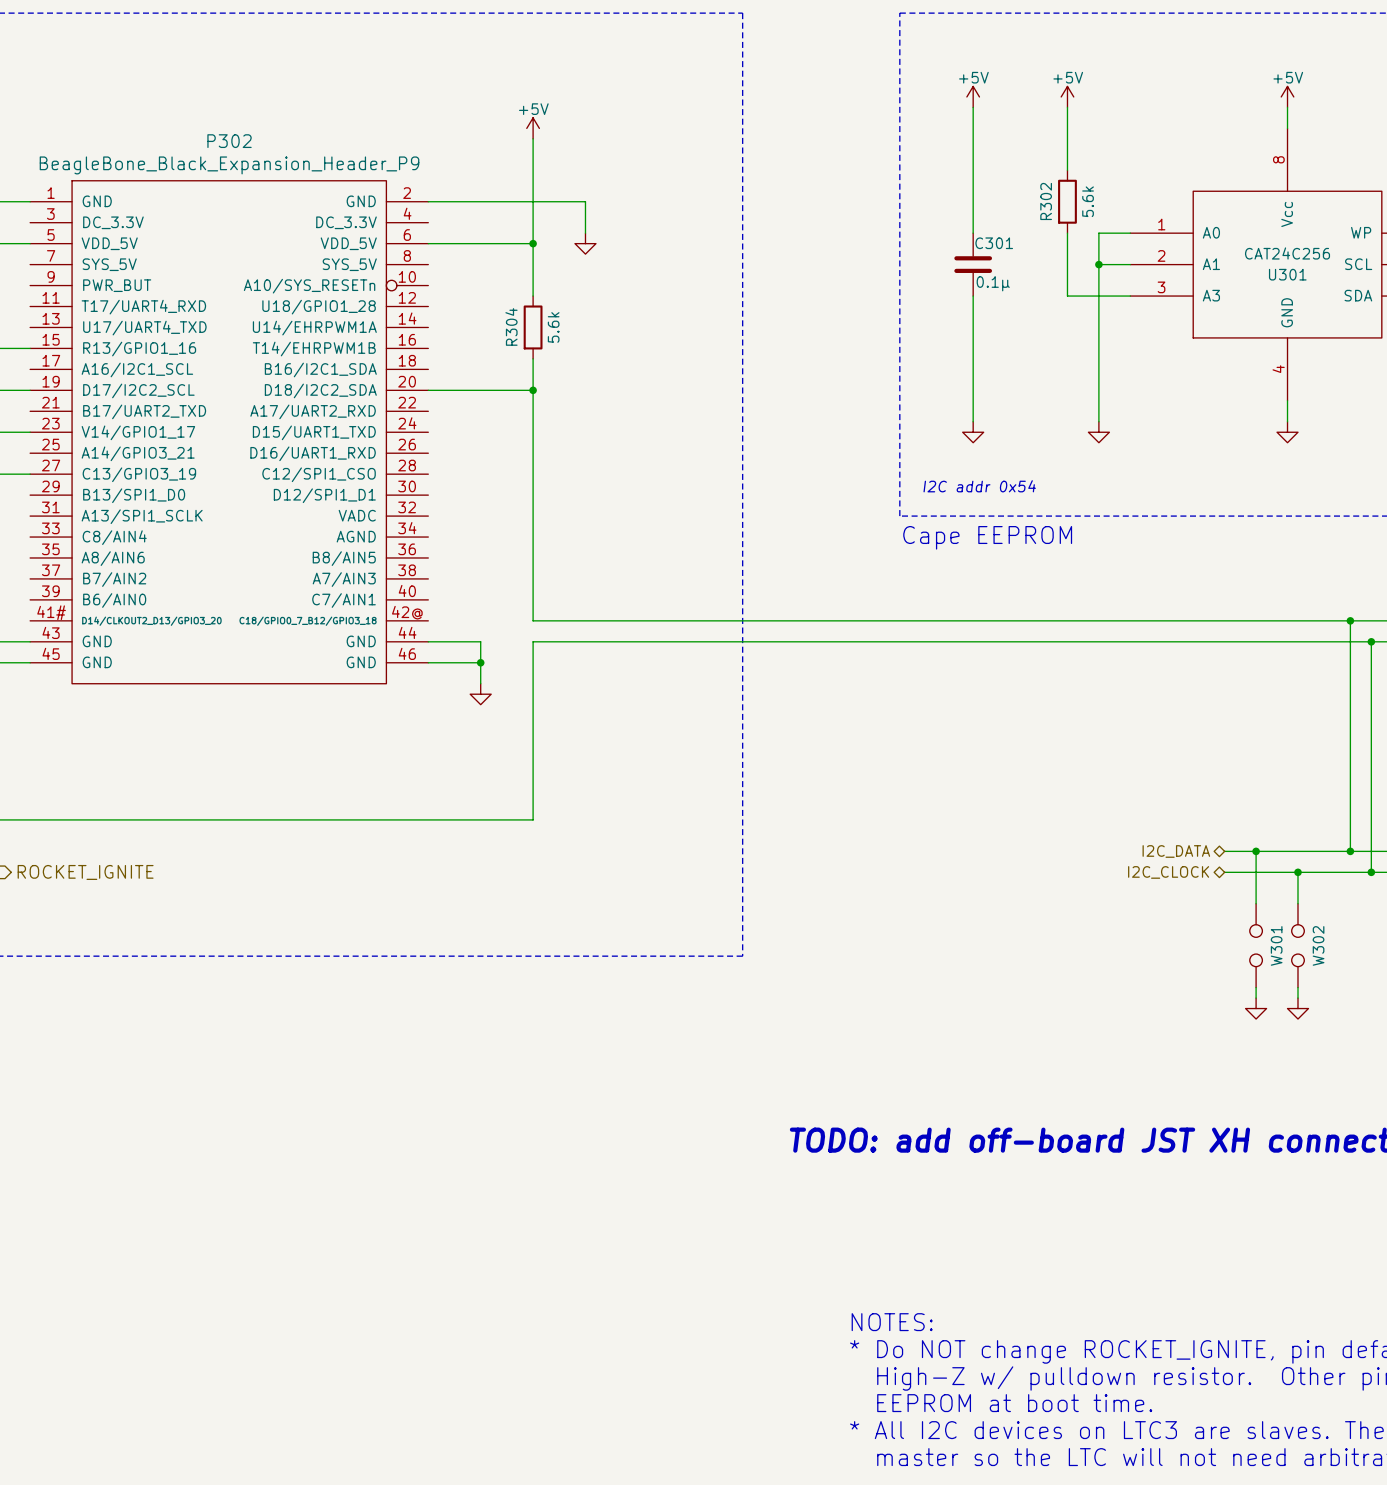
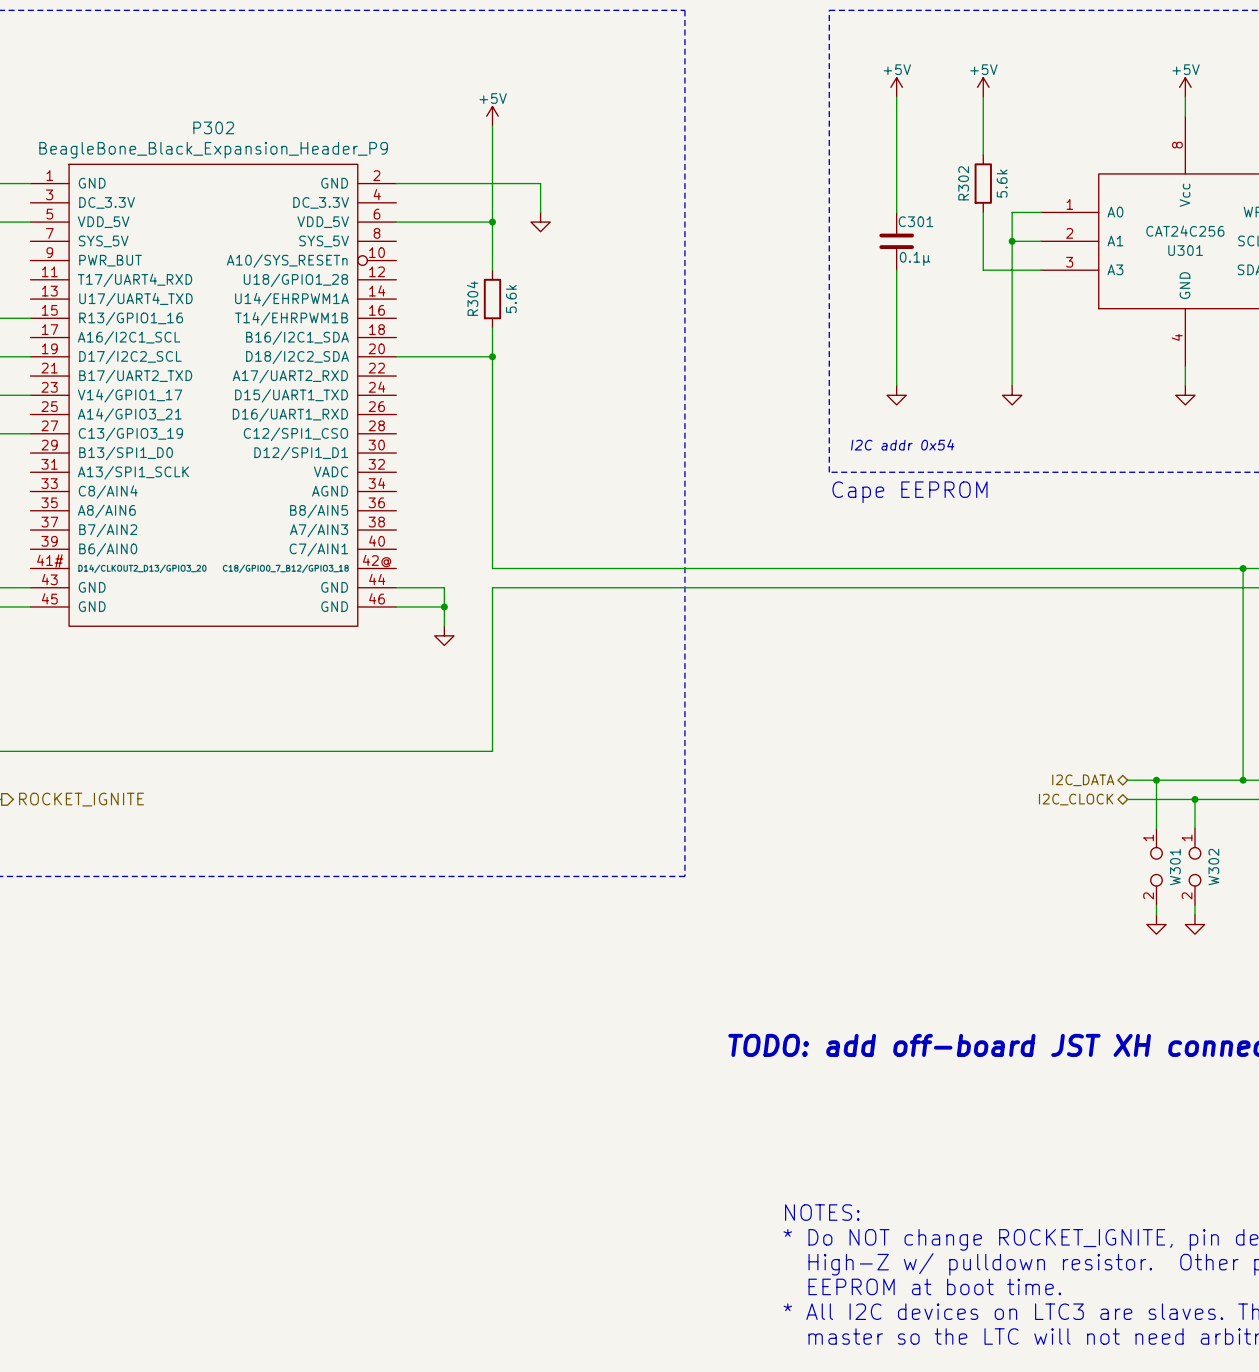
W301 pin number: none -> 1 (1148, 837)
W302 pin number: none -> 1 (1187, 837)
W301 pin number: none -> 2 (1148, 895)
W302 pin number: none -> 2 (1187, 895)

